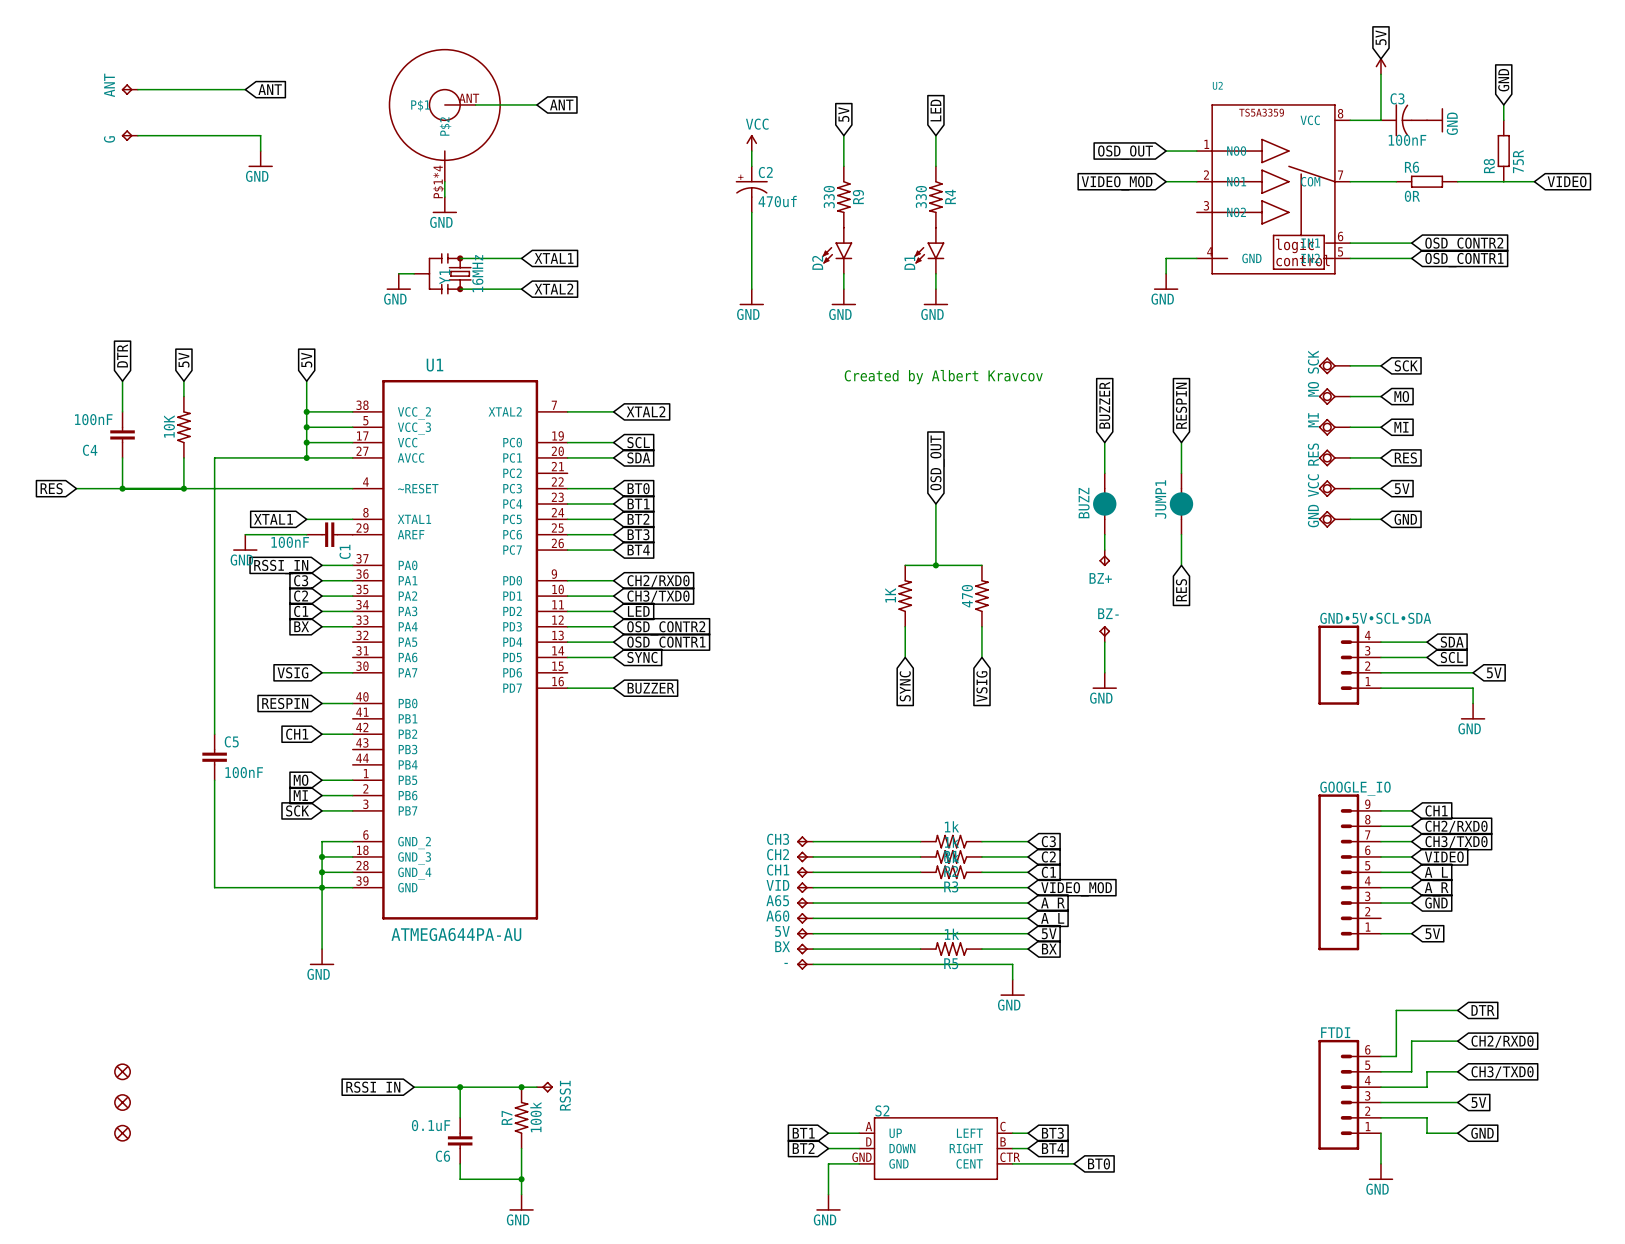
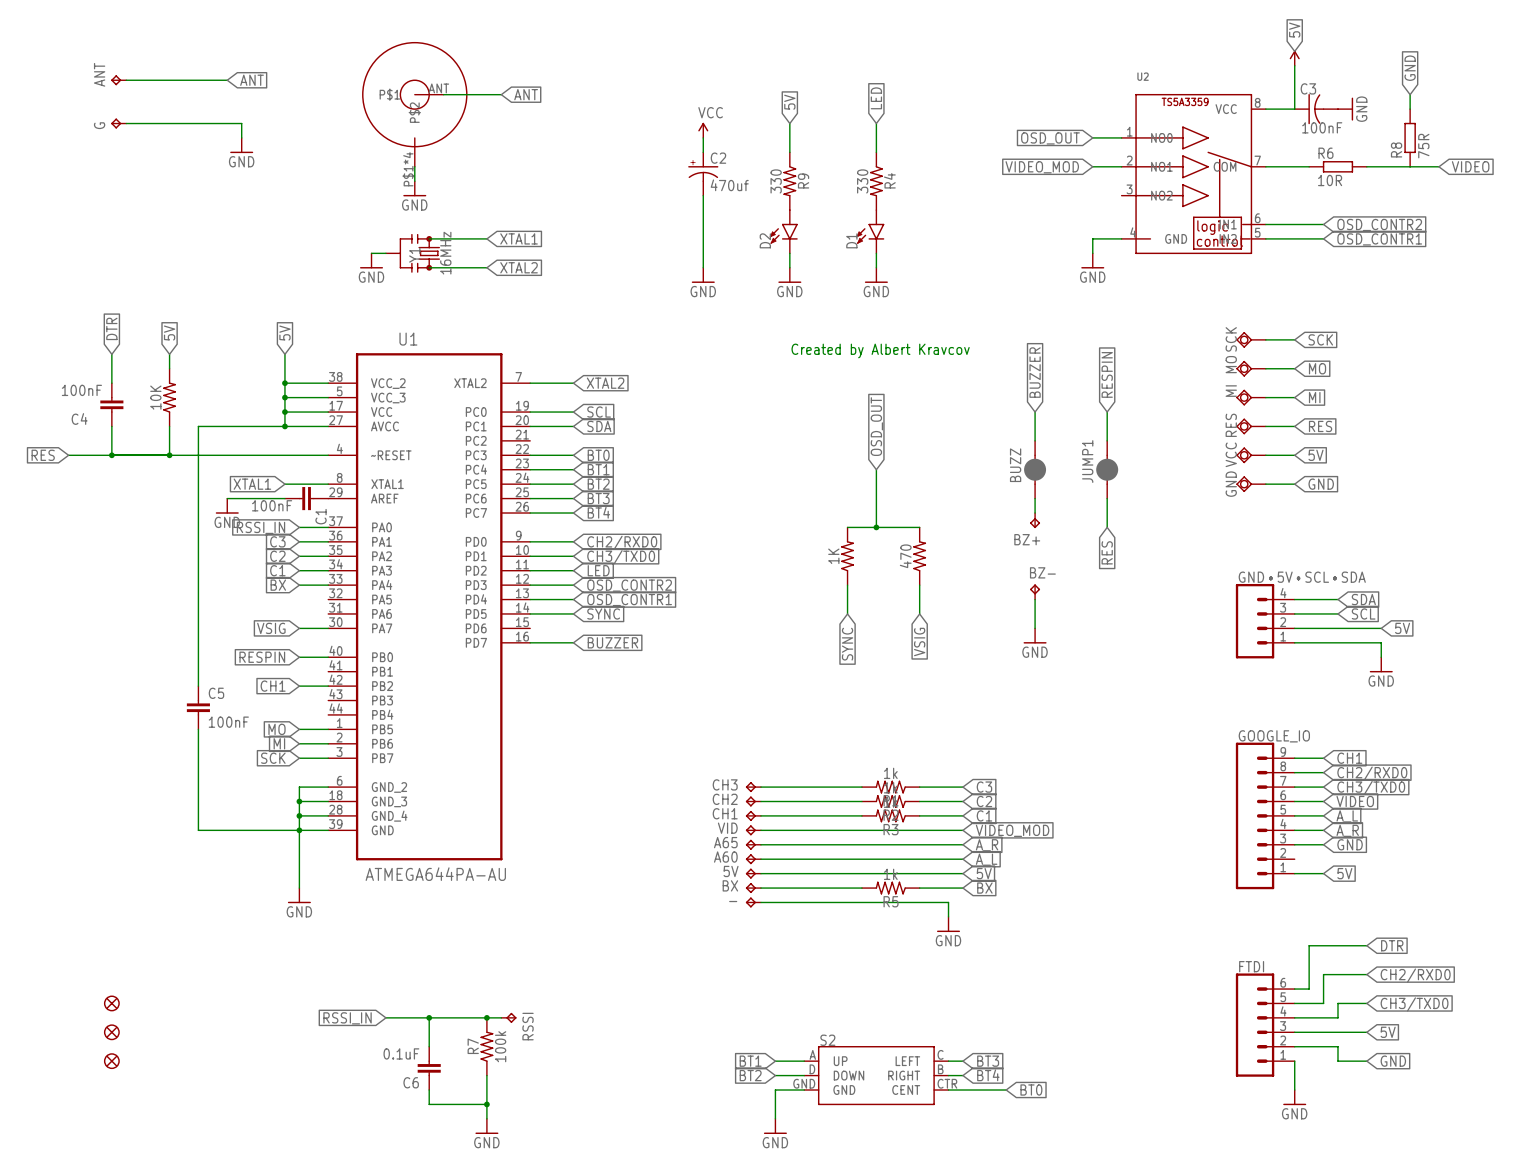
R6 value: 0R (1412, 196) -> 10R (1330, 180)

